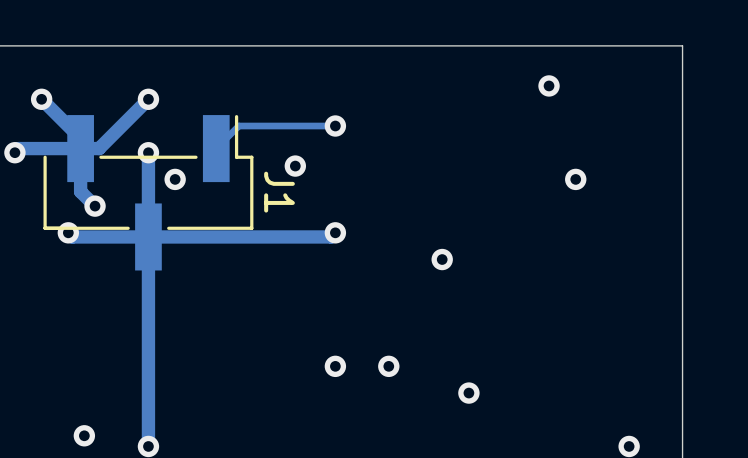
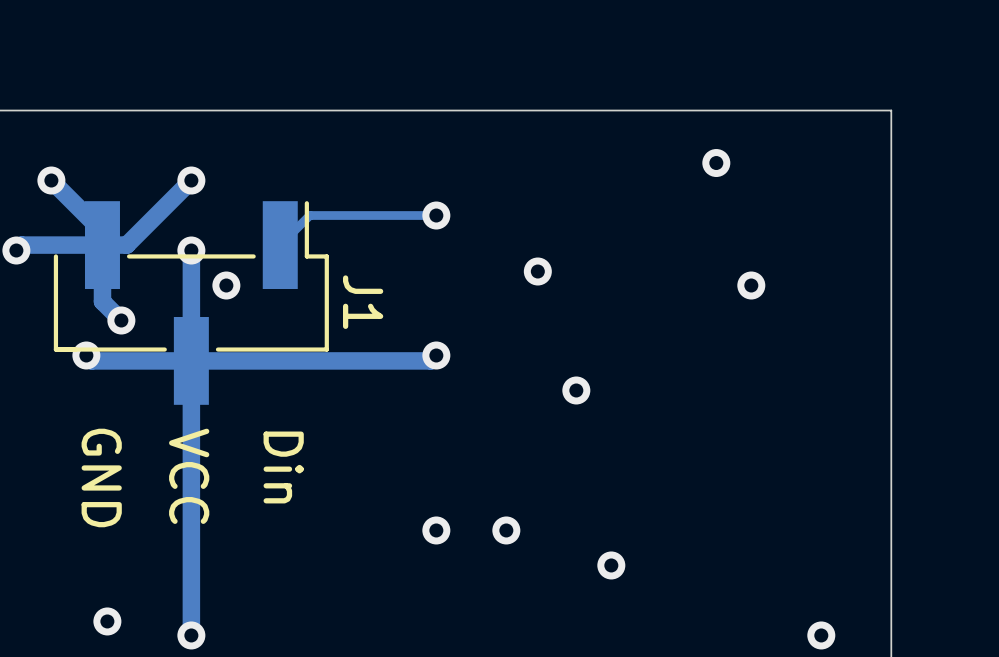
via position: (295, 166) -> (537, 271)
text: none -> Din (283, 467)
text: none -> VCC (189, 476)
text: none -> GND (101, 477)

